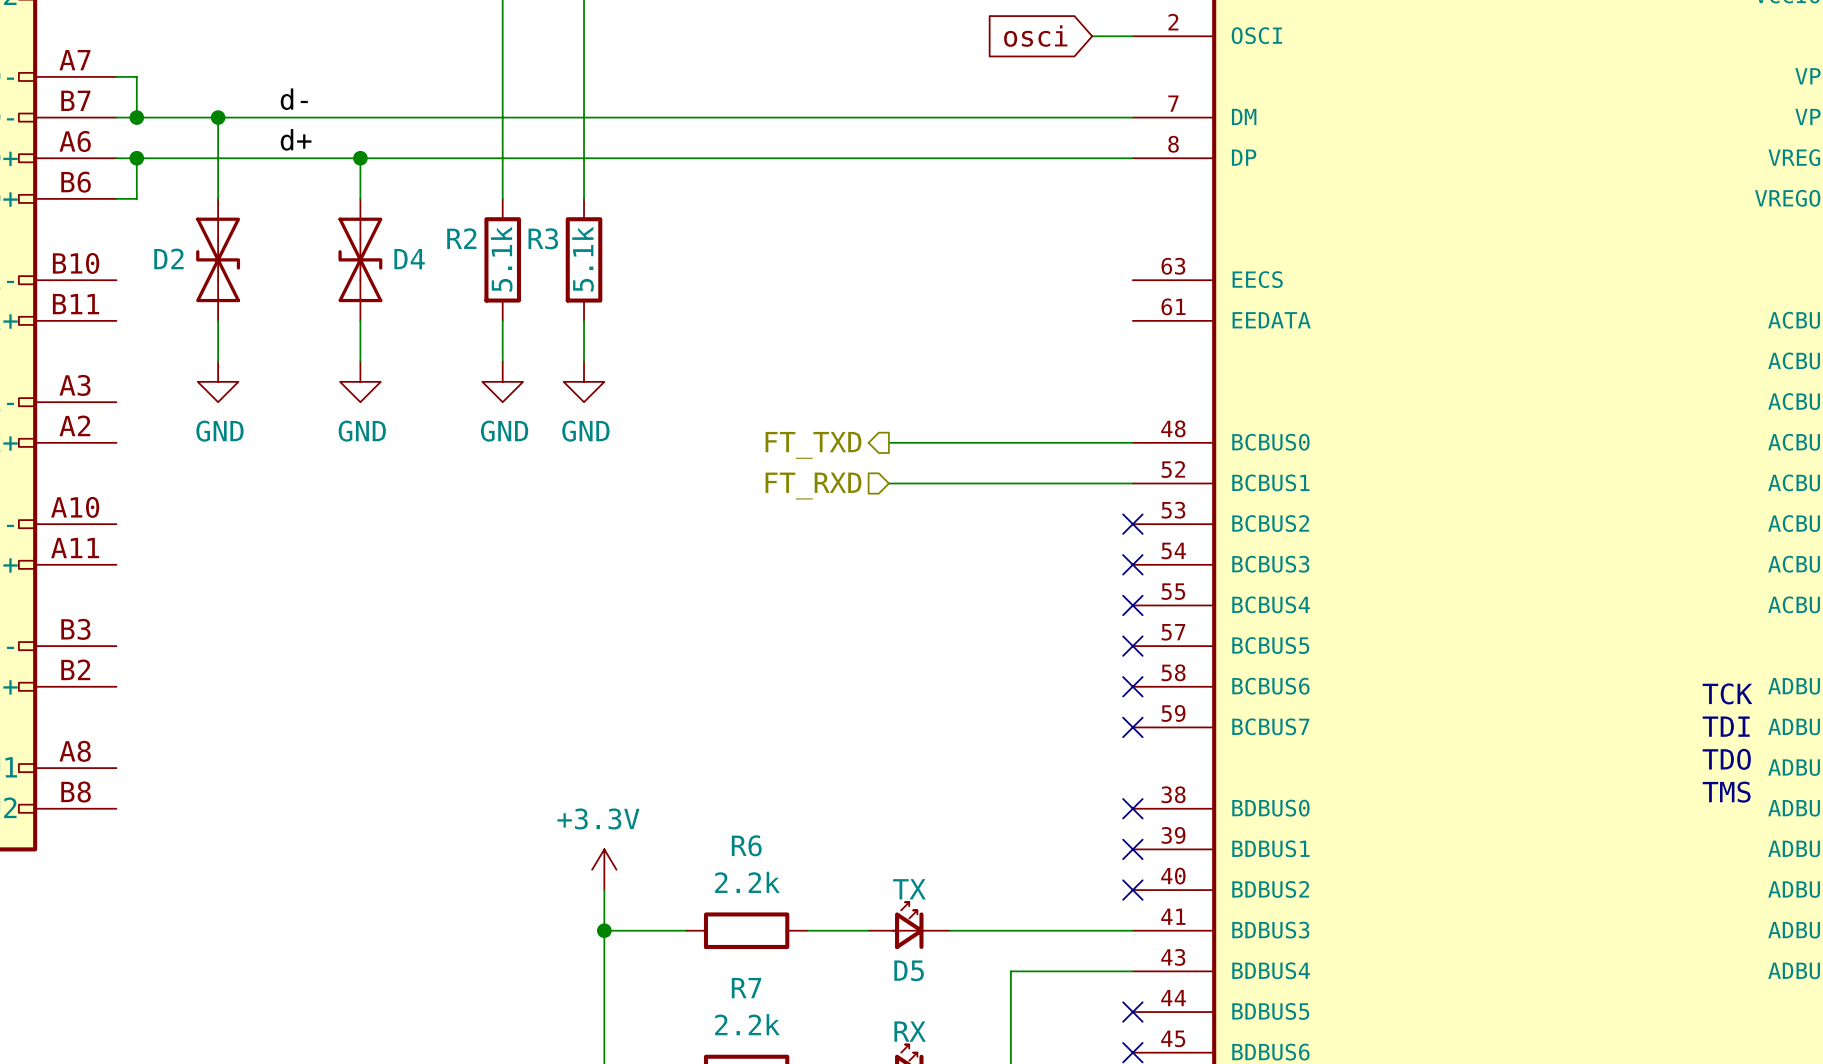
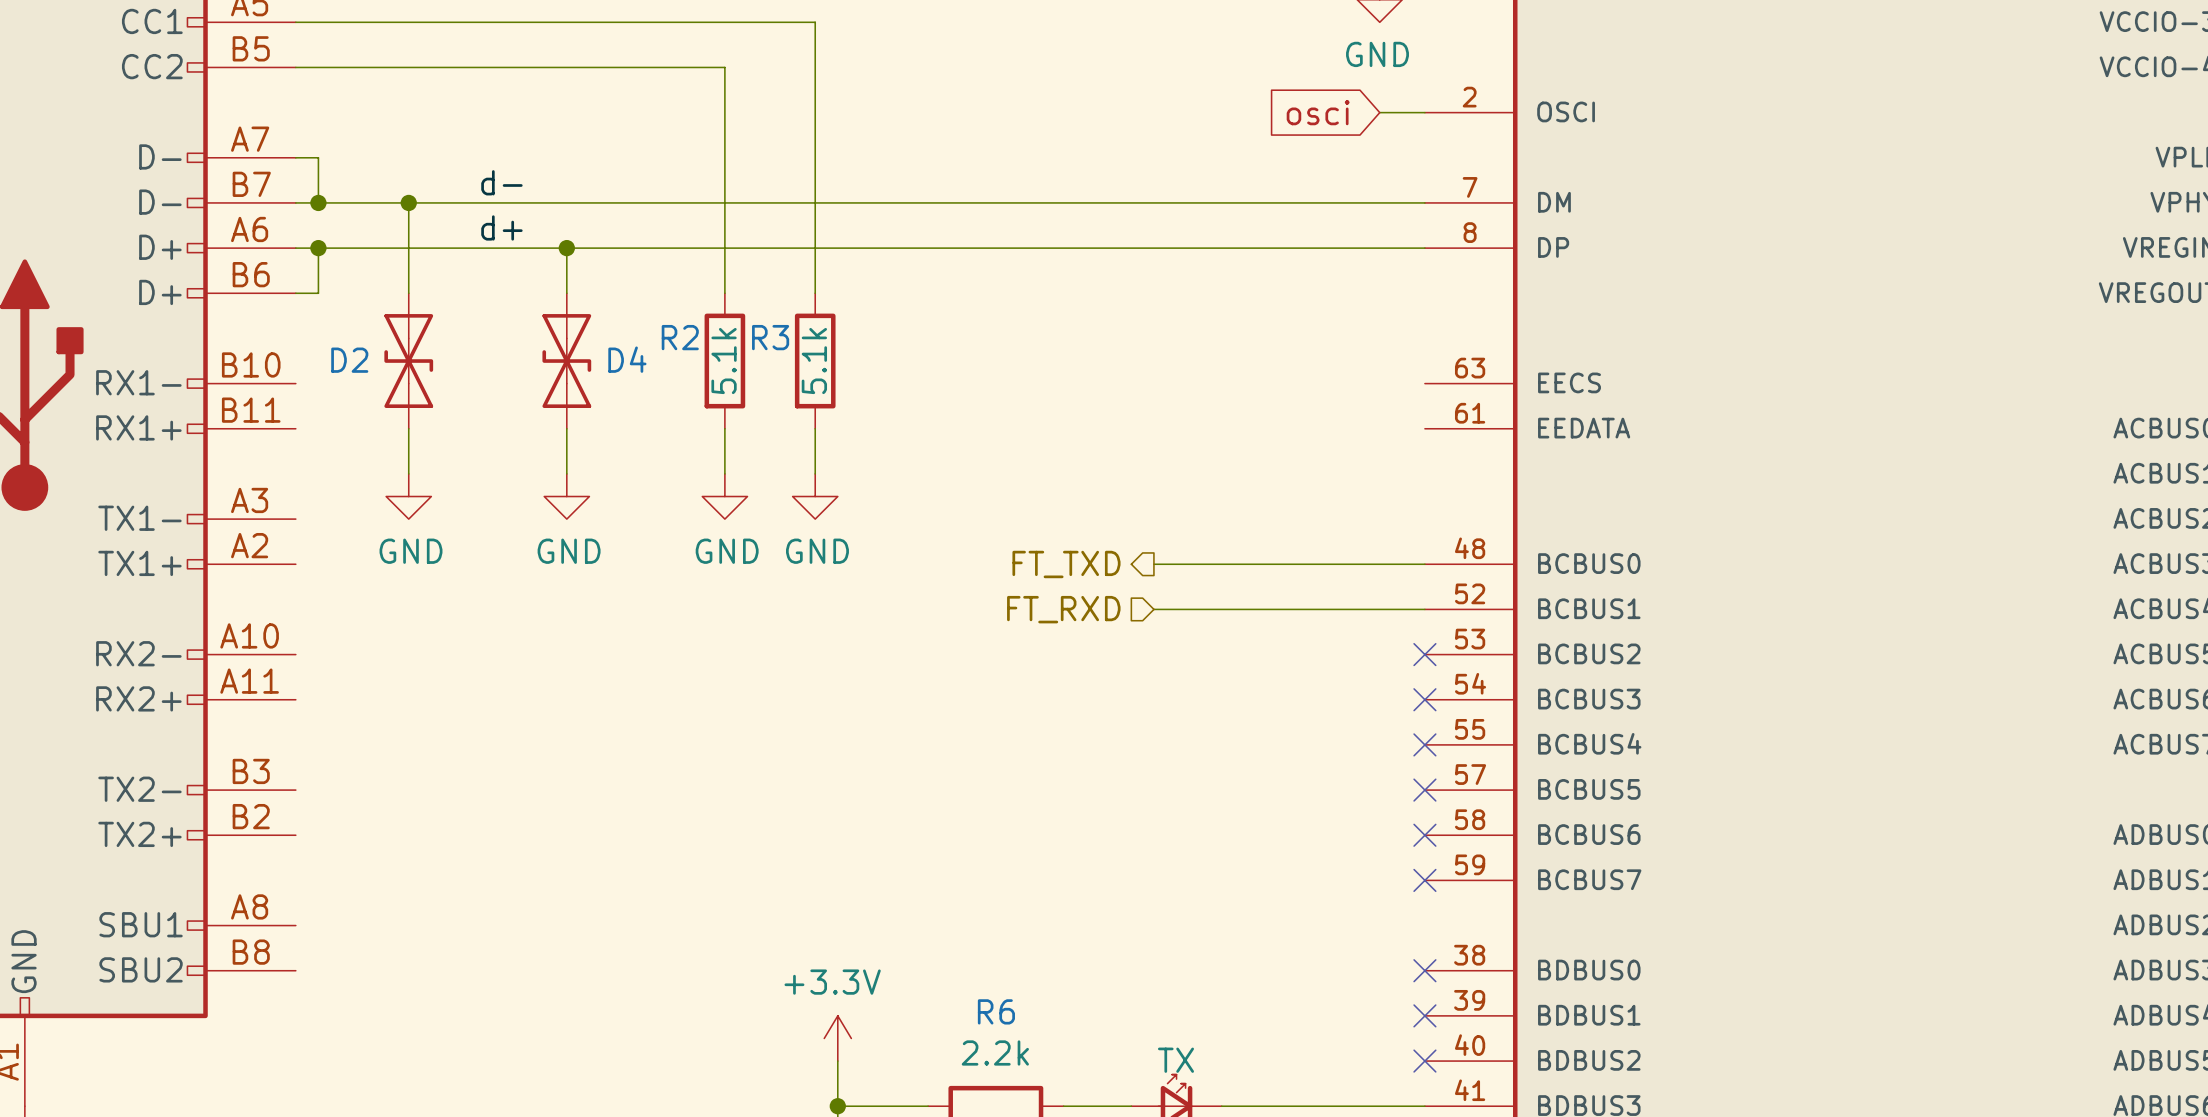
text: TCK (1727, 693) -> none
text: TDI (1726, 726) -> none
text: TDO (1726, 759) -> none
text: TMS (1726, 792) -> none

